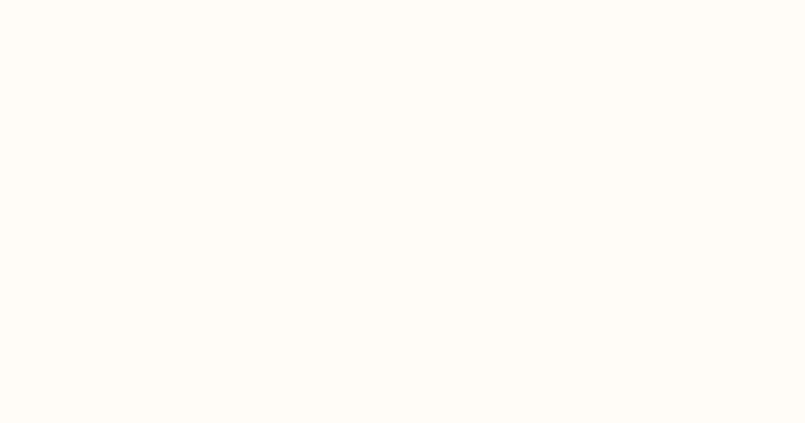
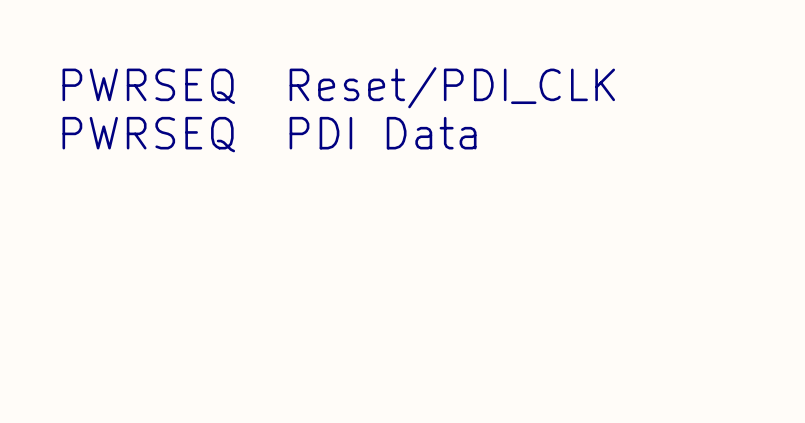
text: none -> PWRSEQ Reset/PDI_CLK (338, 87)
text: none -> PWRSEQ PDI Data (269, 134)

